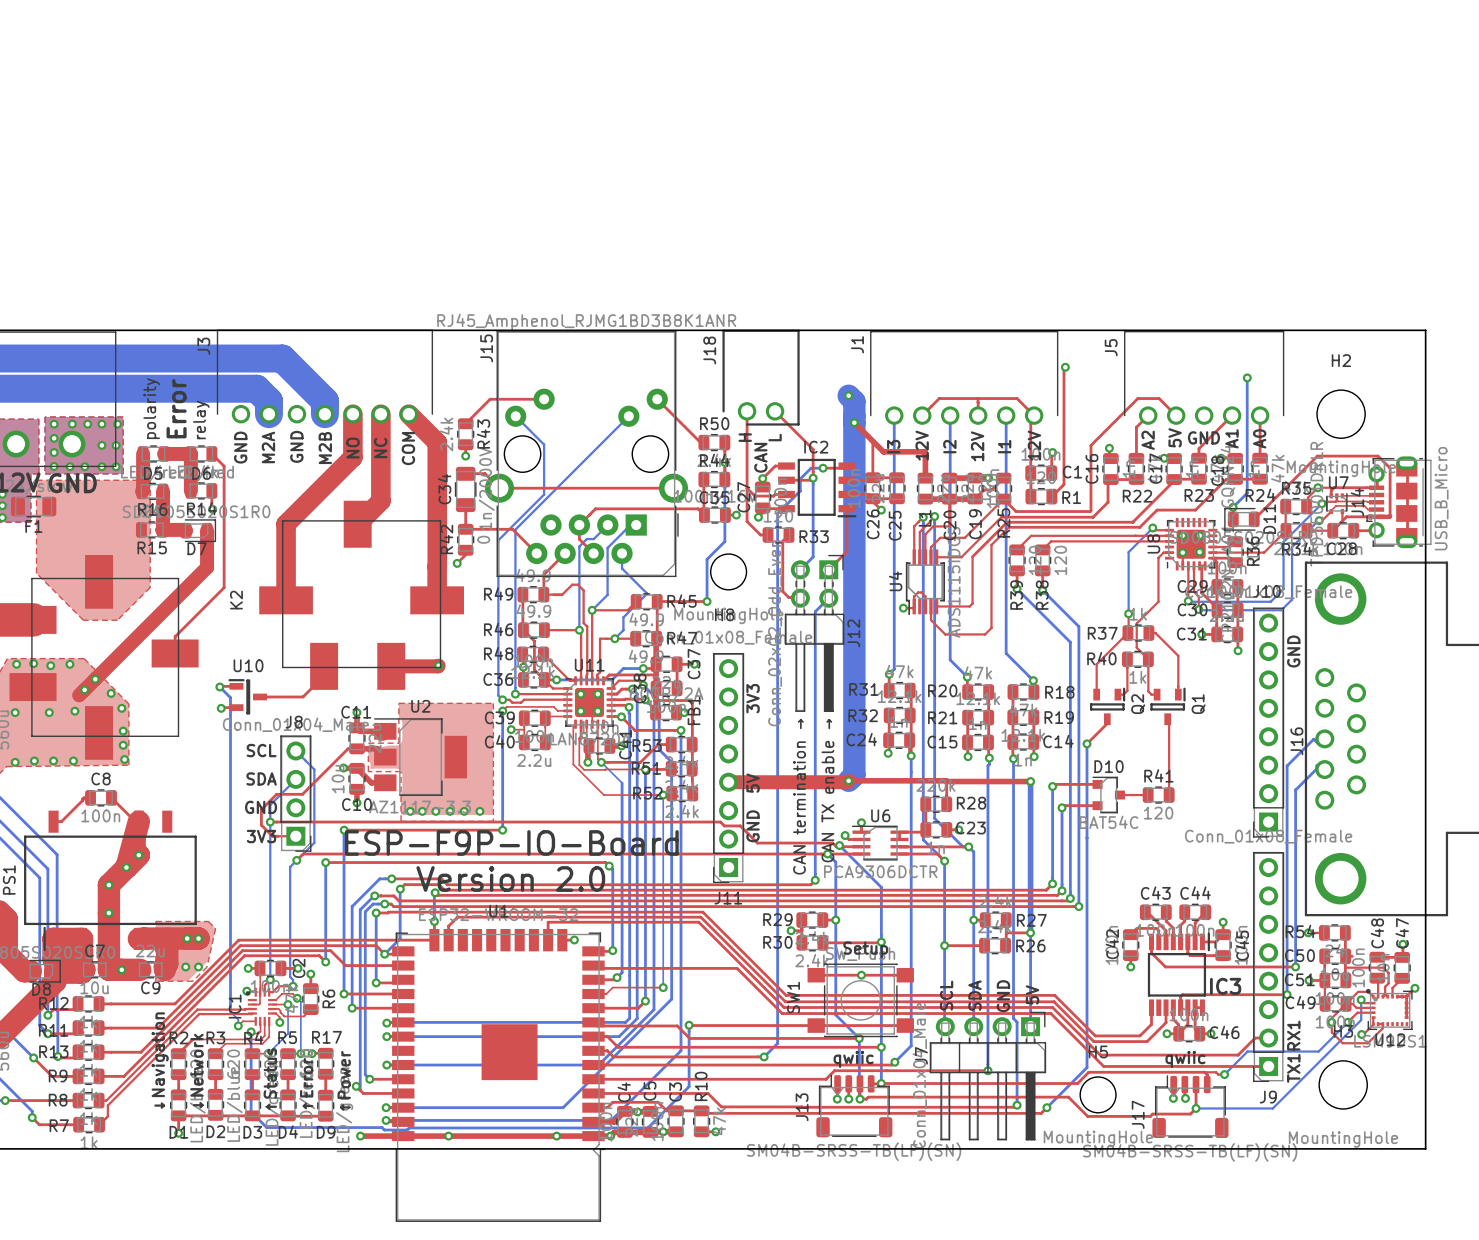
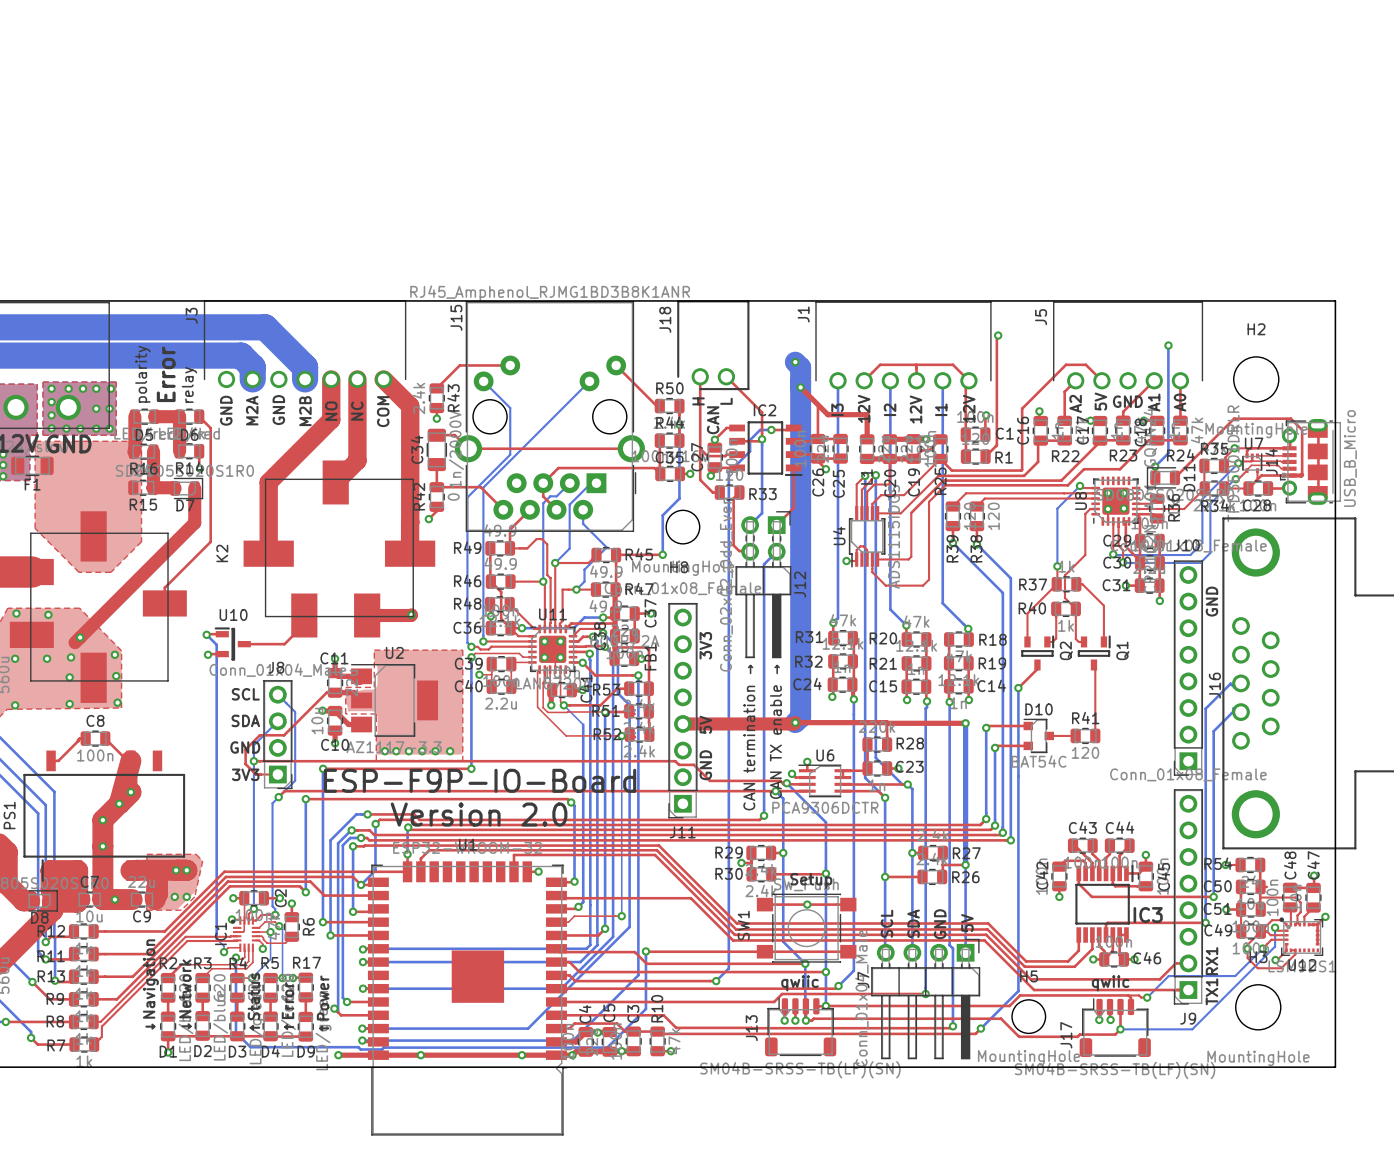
via: (33, 663) -> none
via: (69, 664) -> none
via: (95, 679) -> none
via: (111, 693) -> none
via: none -> (69, 677)
via: (123, 745) -> none
via: (34, 760) -> none
via: (53, 760) -> none

